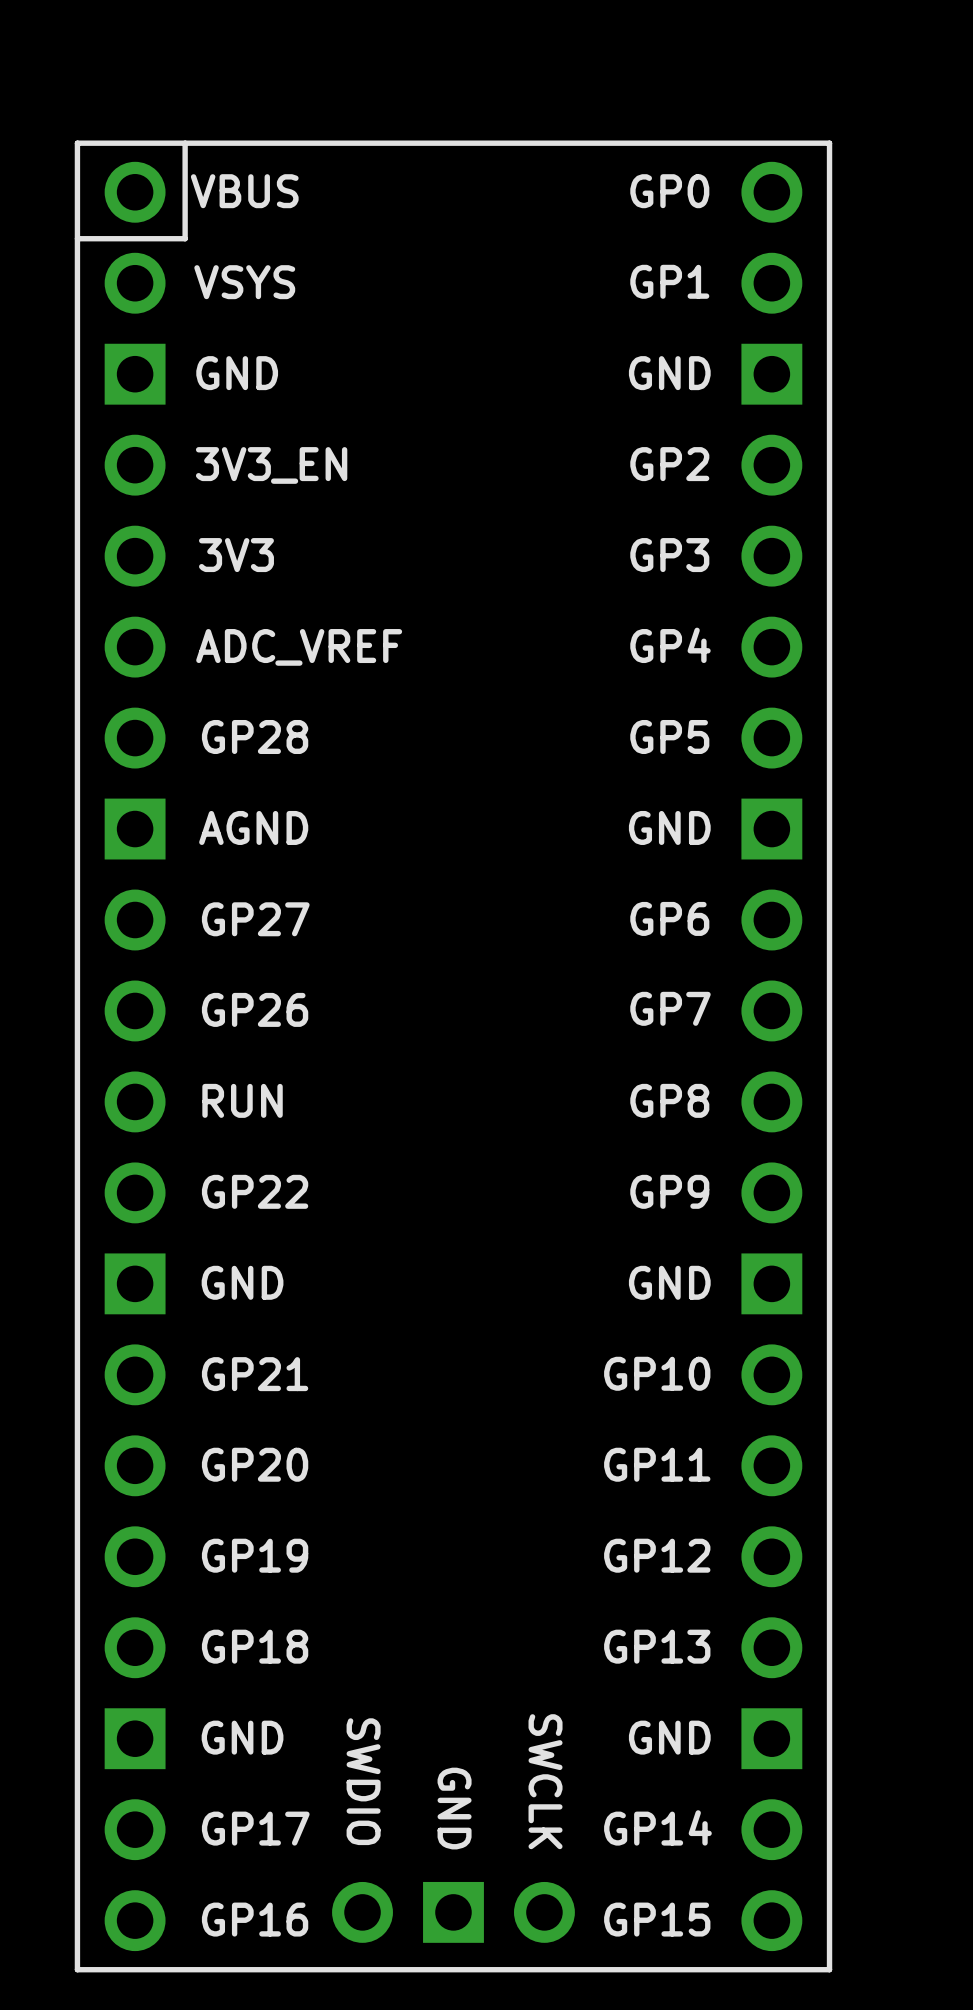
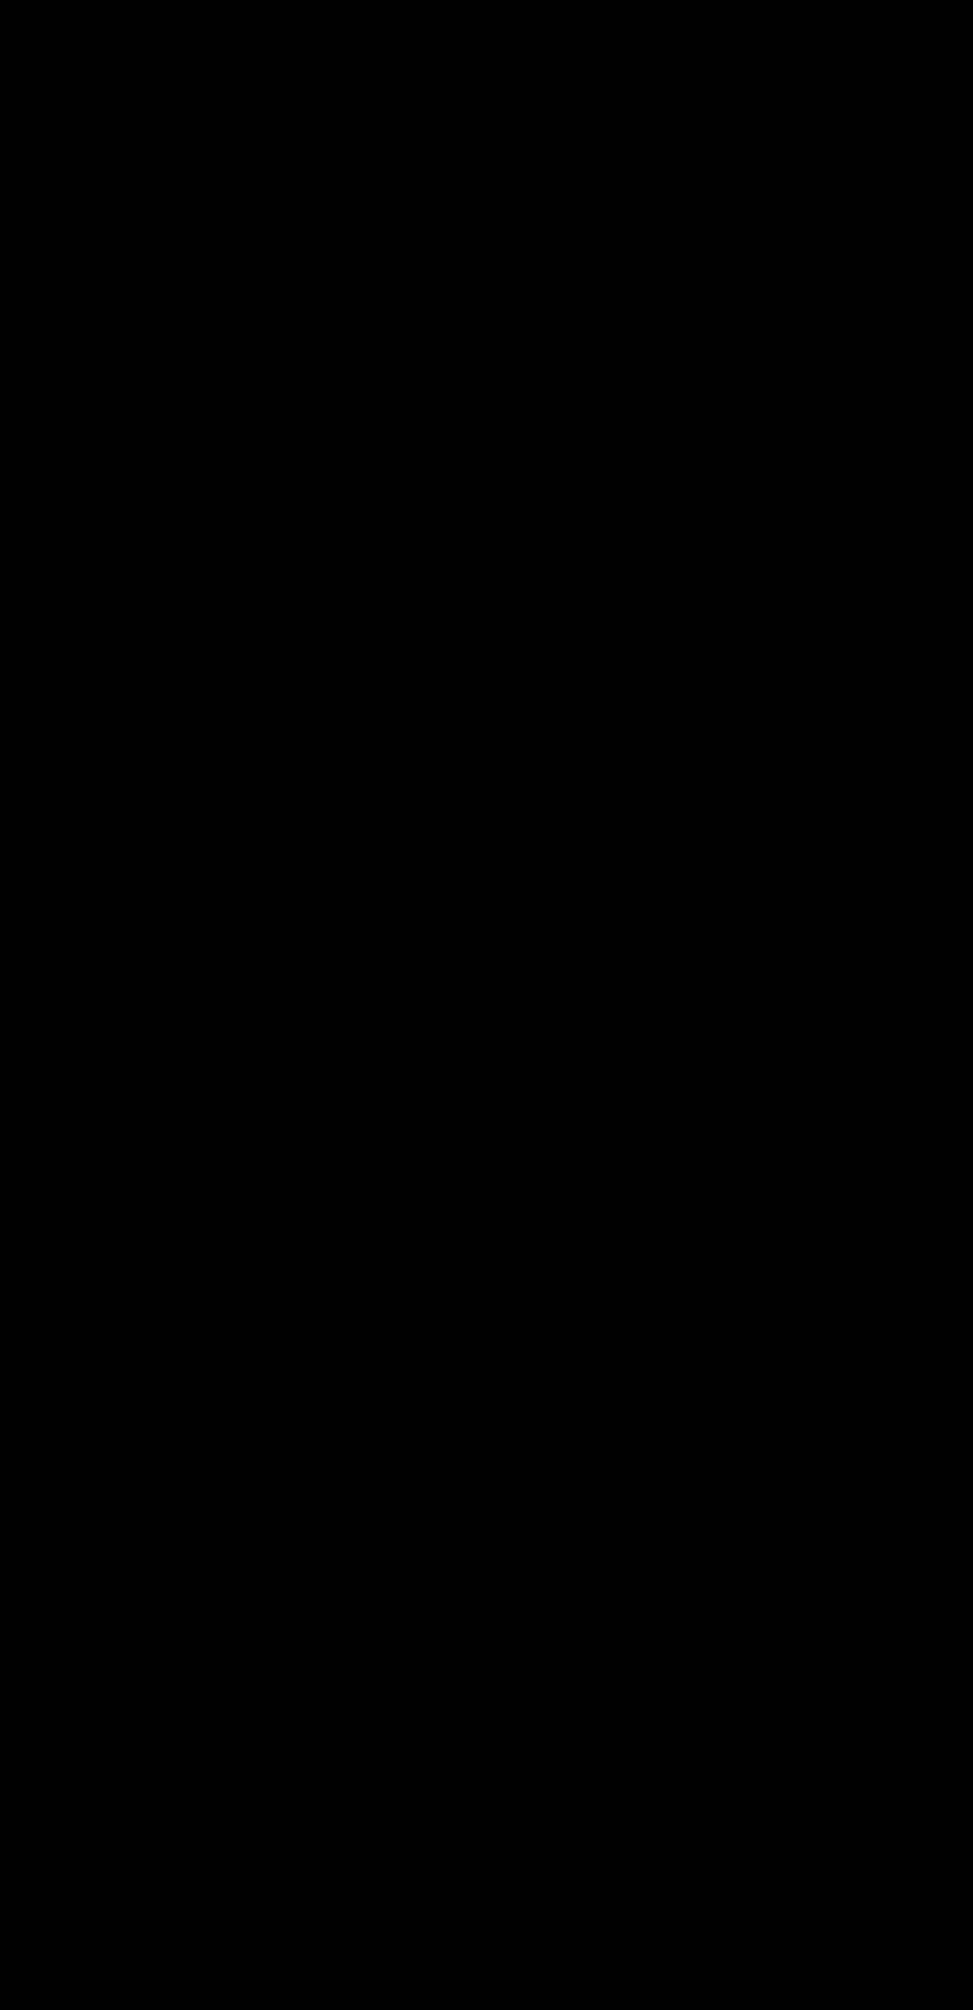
part: (453, 1056) -> none

